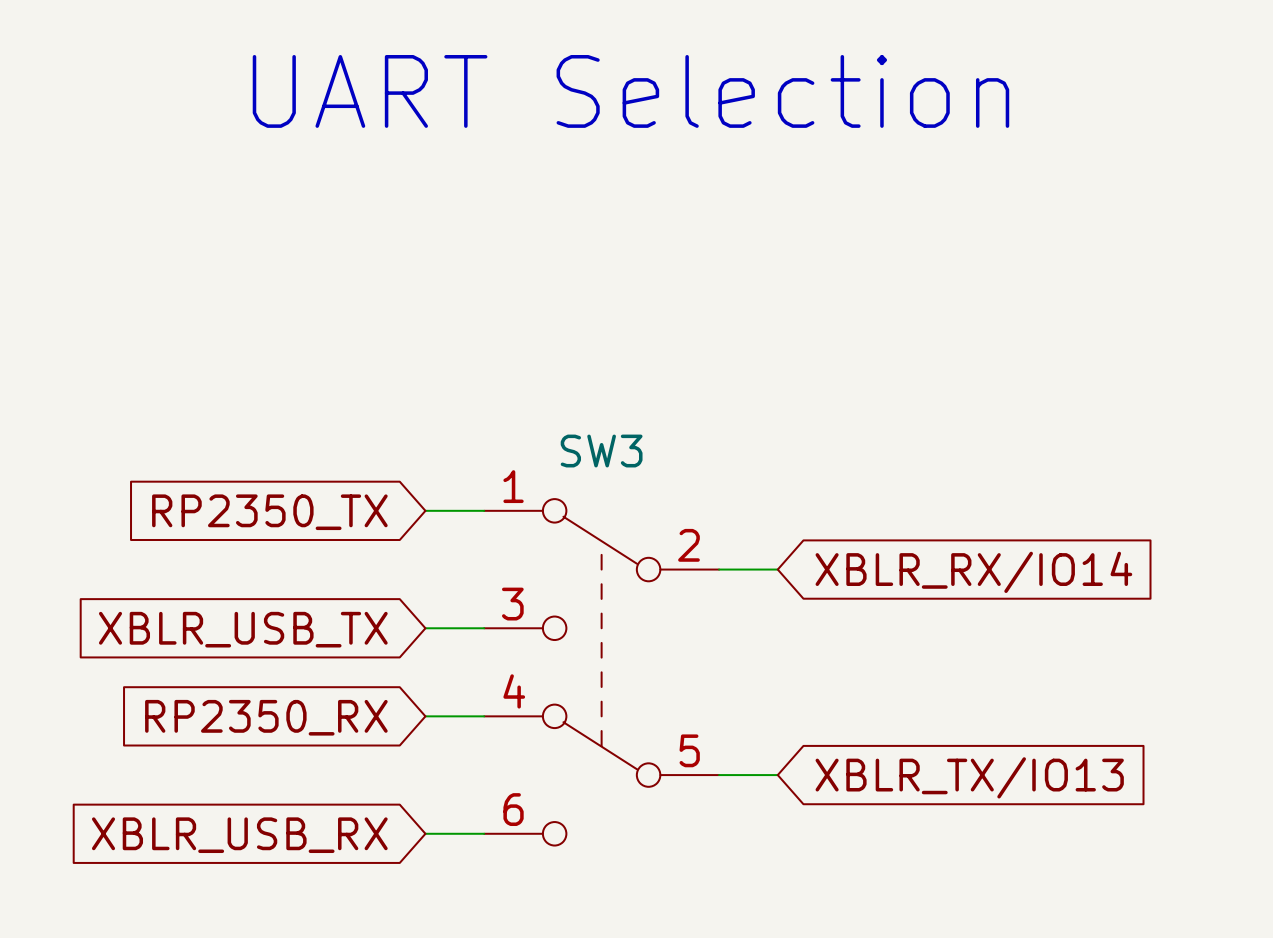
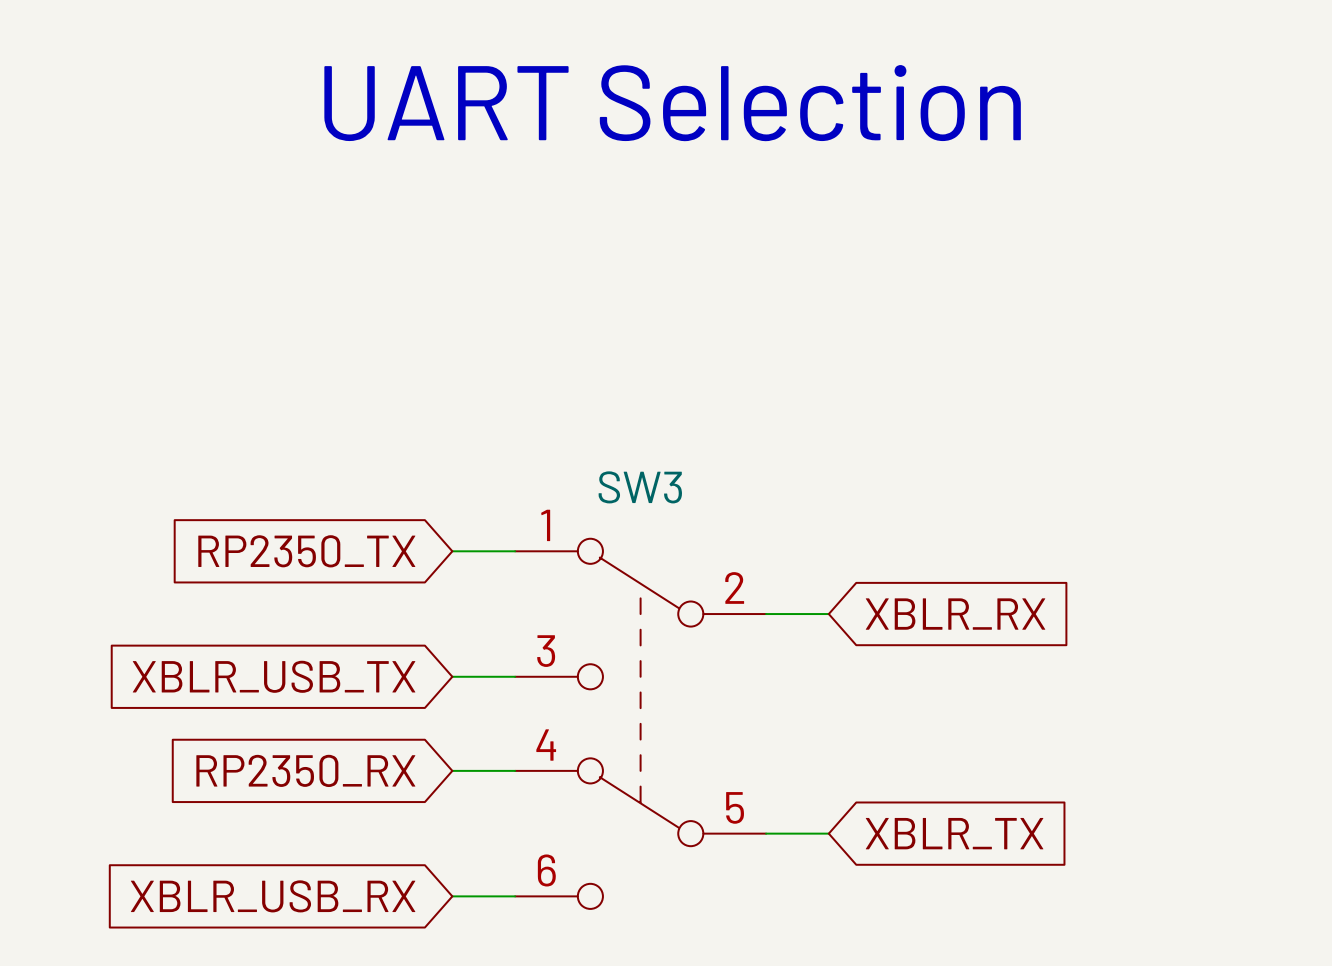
global label: XBLR_RX/IO14 (973, 572) -> XBLR_RX (955, 614)
global label: XBLR_TX/IO13 (969, 777) -> XBLR_TX (954, 833)

